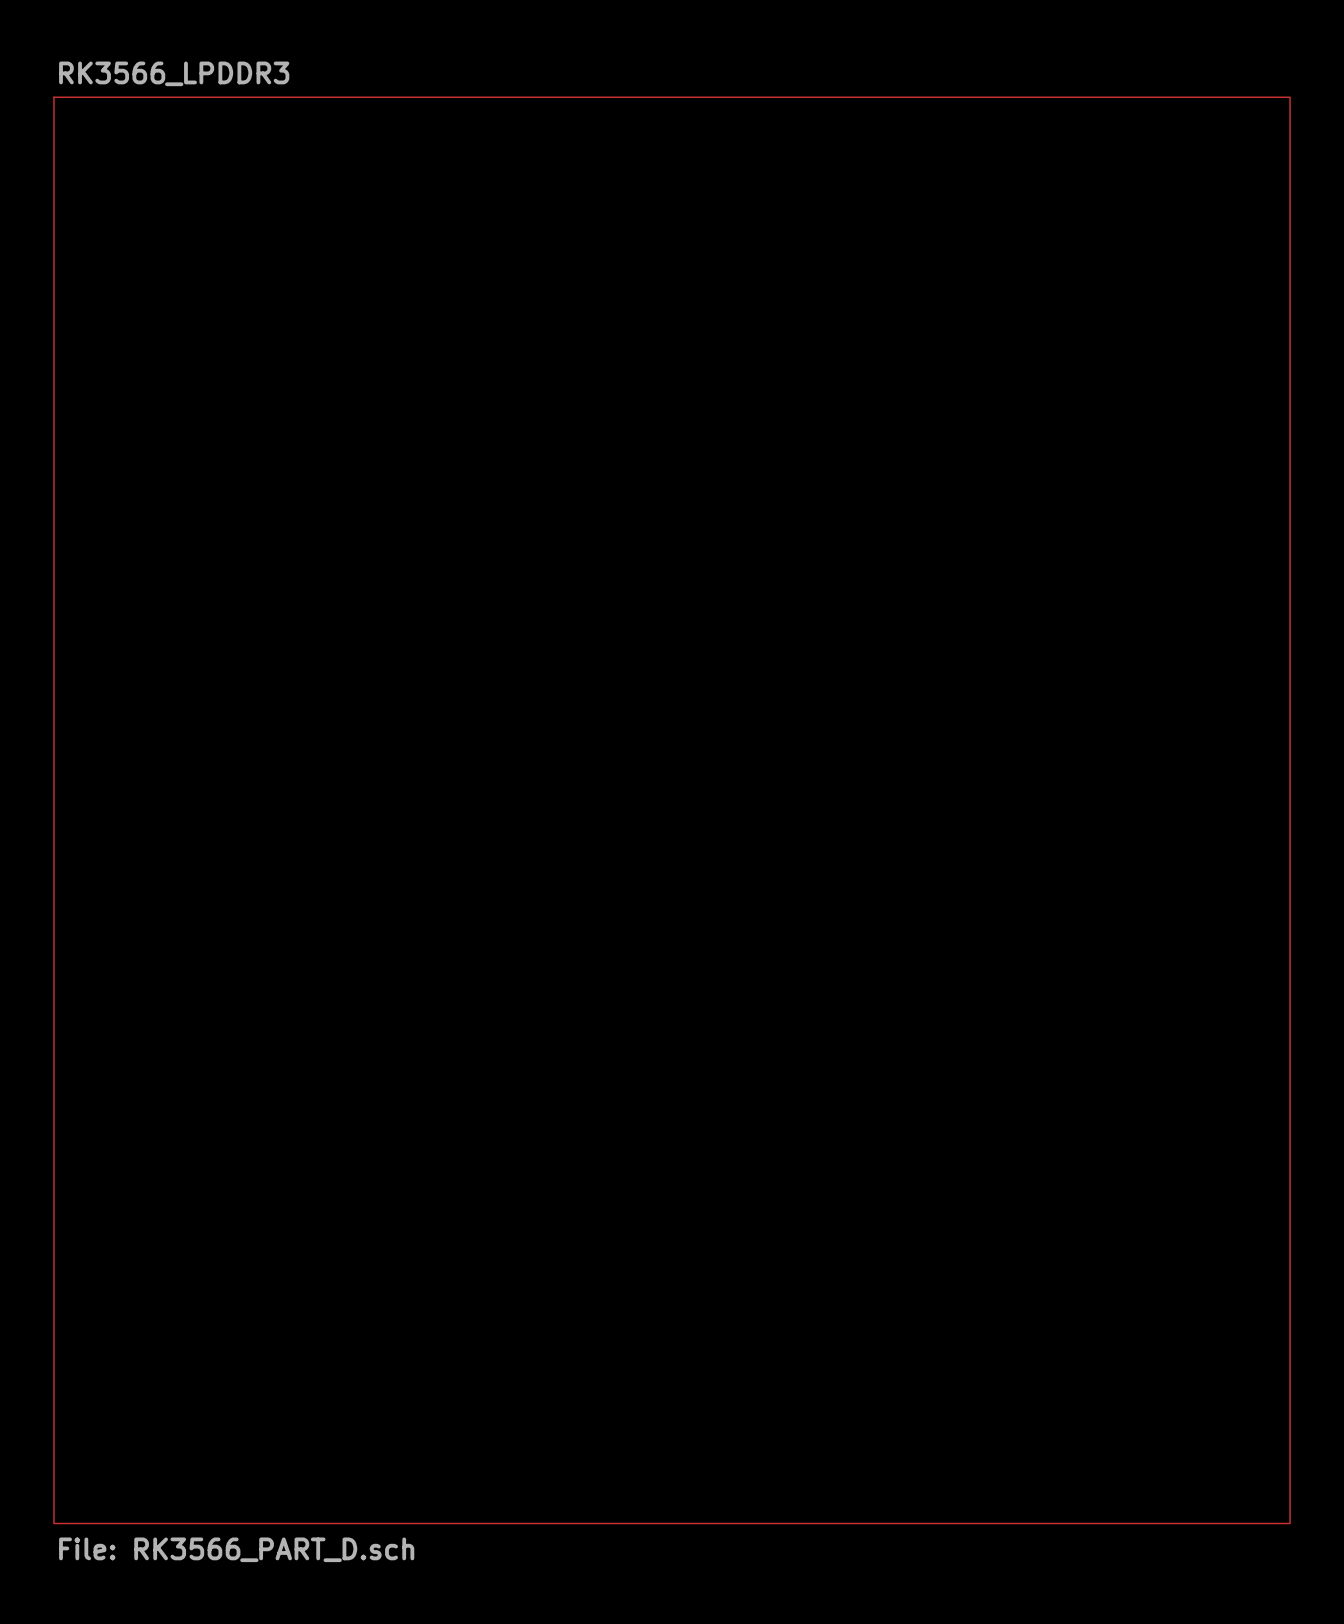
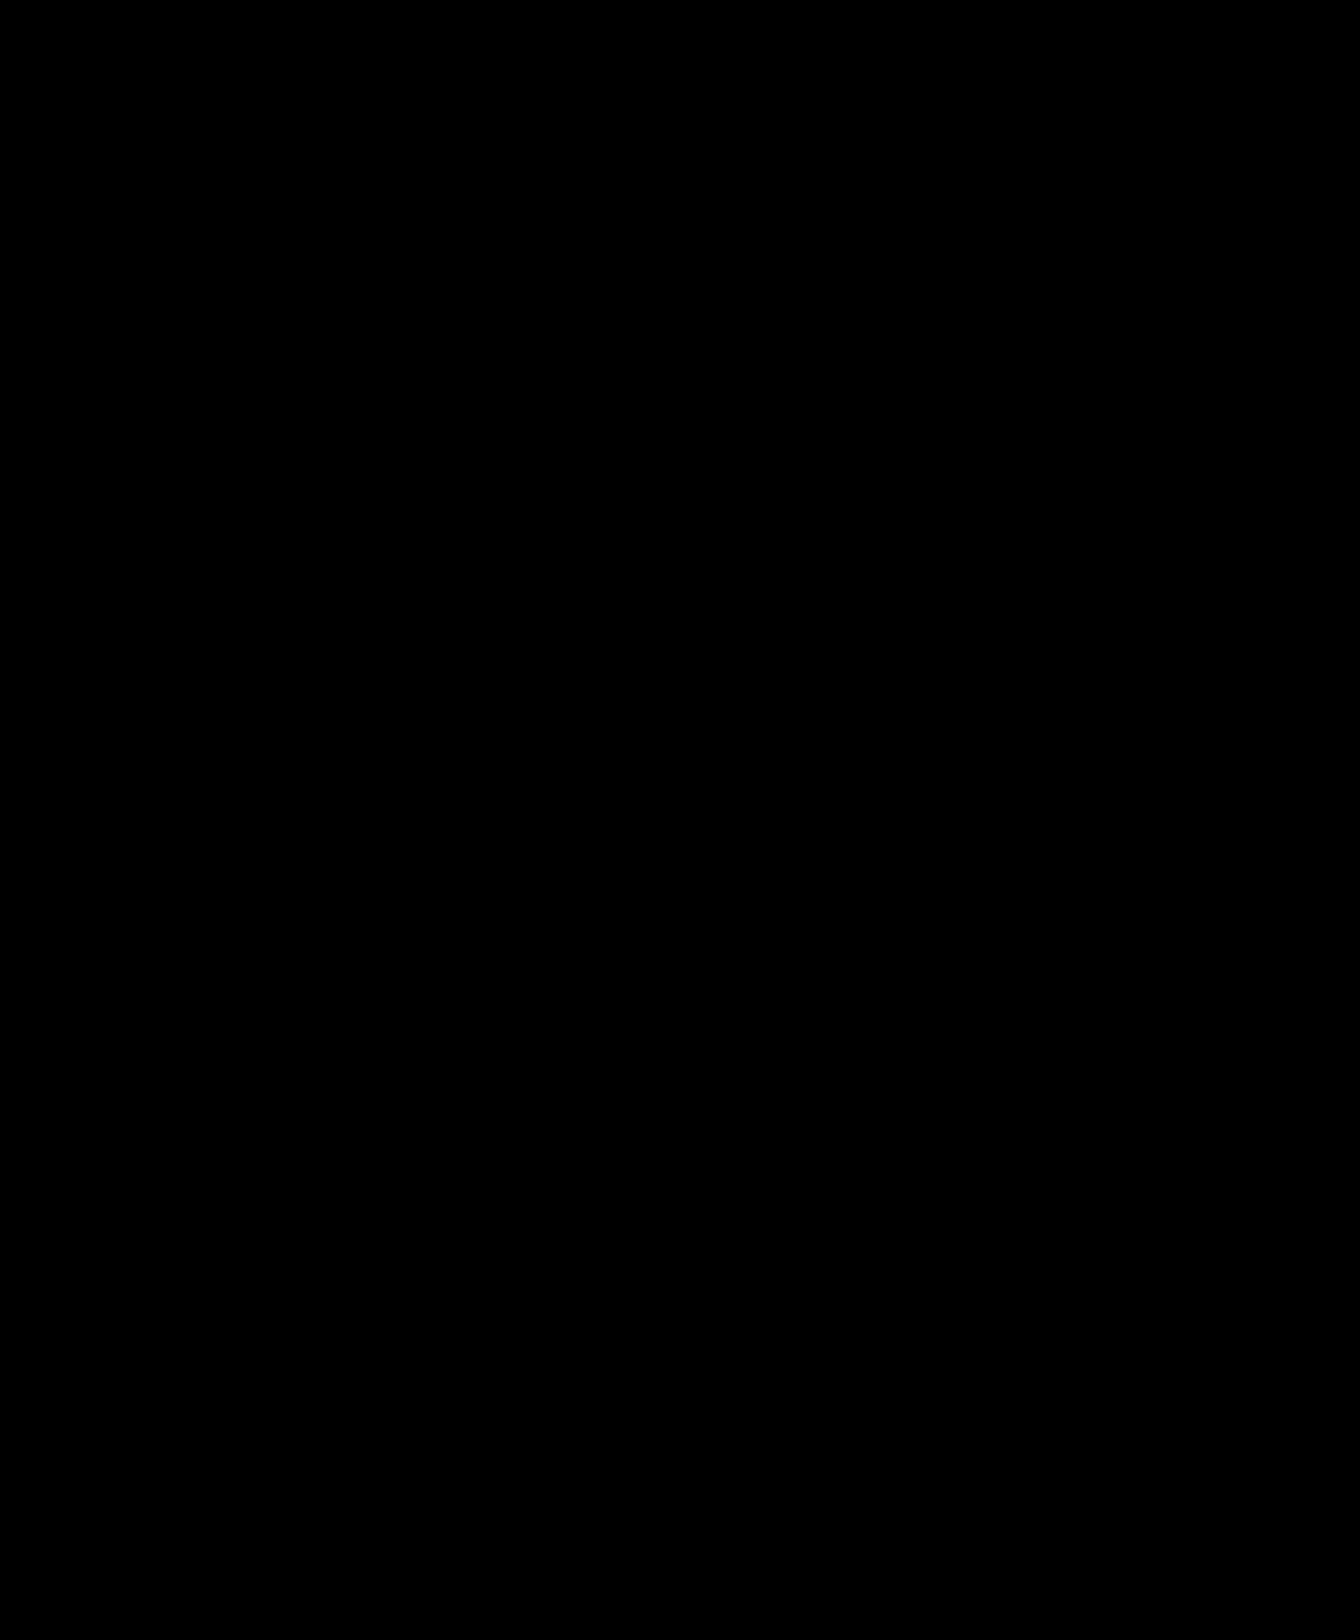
sheet RK3566_LPDDR3: File: RK3566_PART_D.sch (672, 810) -> none

